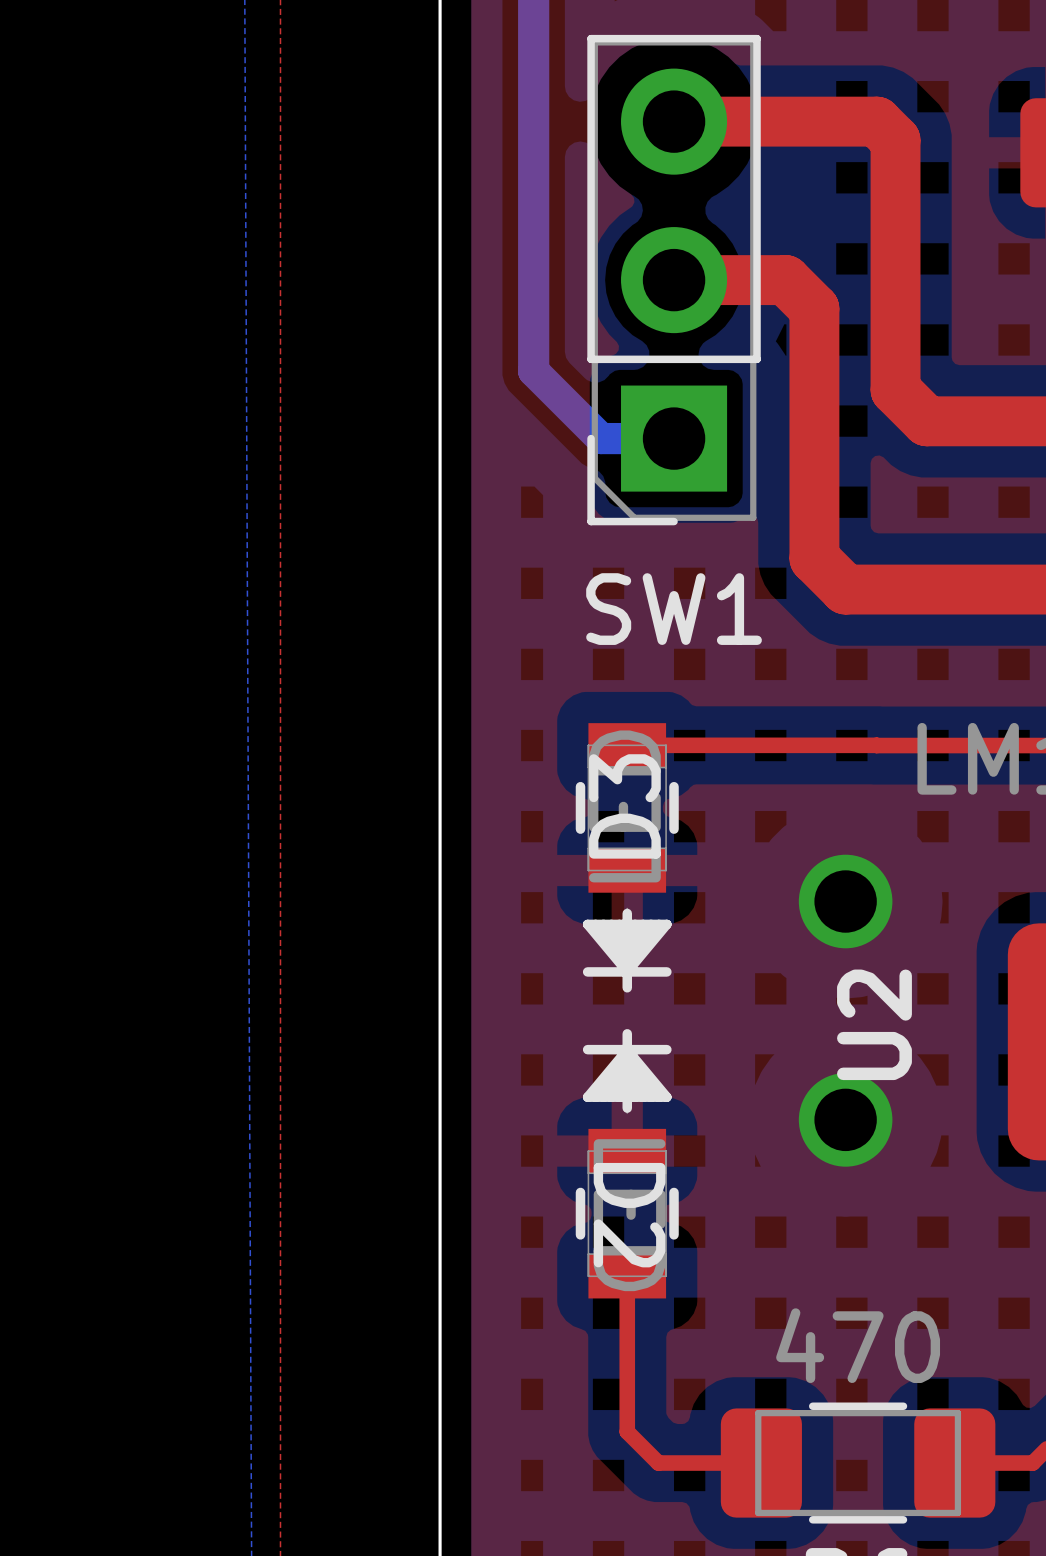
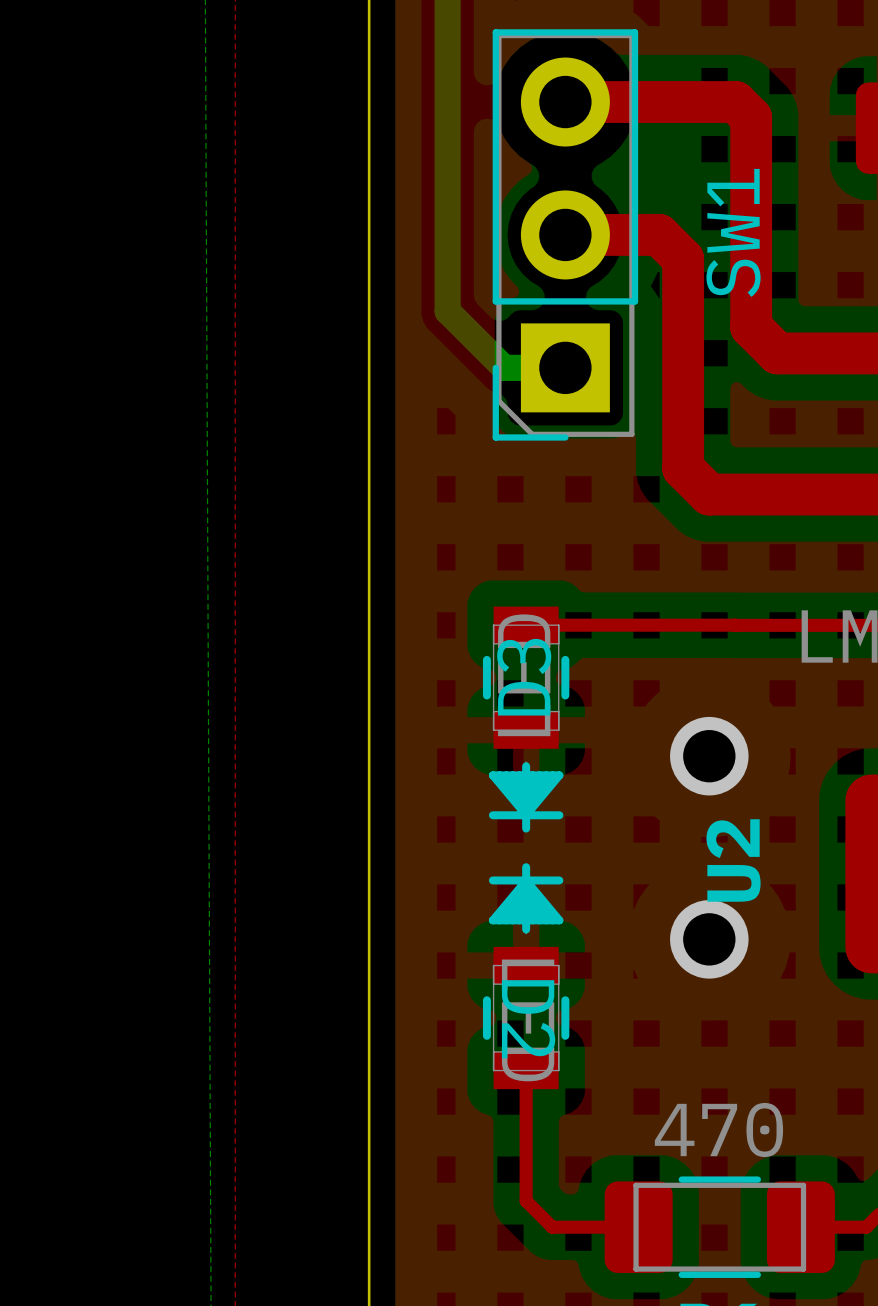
SW1 name rotation: 0° (674, 609) -> 90° counterclockwise (733, 232)
SW1 name position: SW1 (674, 609) -> SW1 (733, 232)

